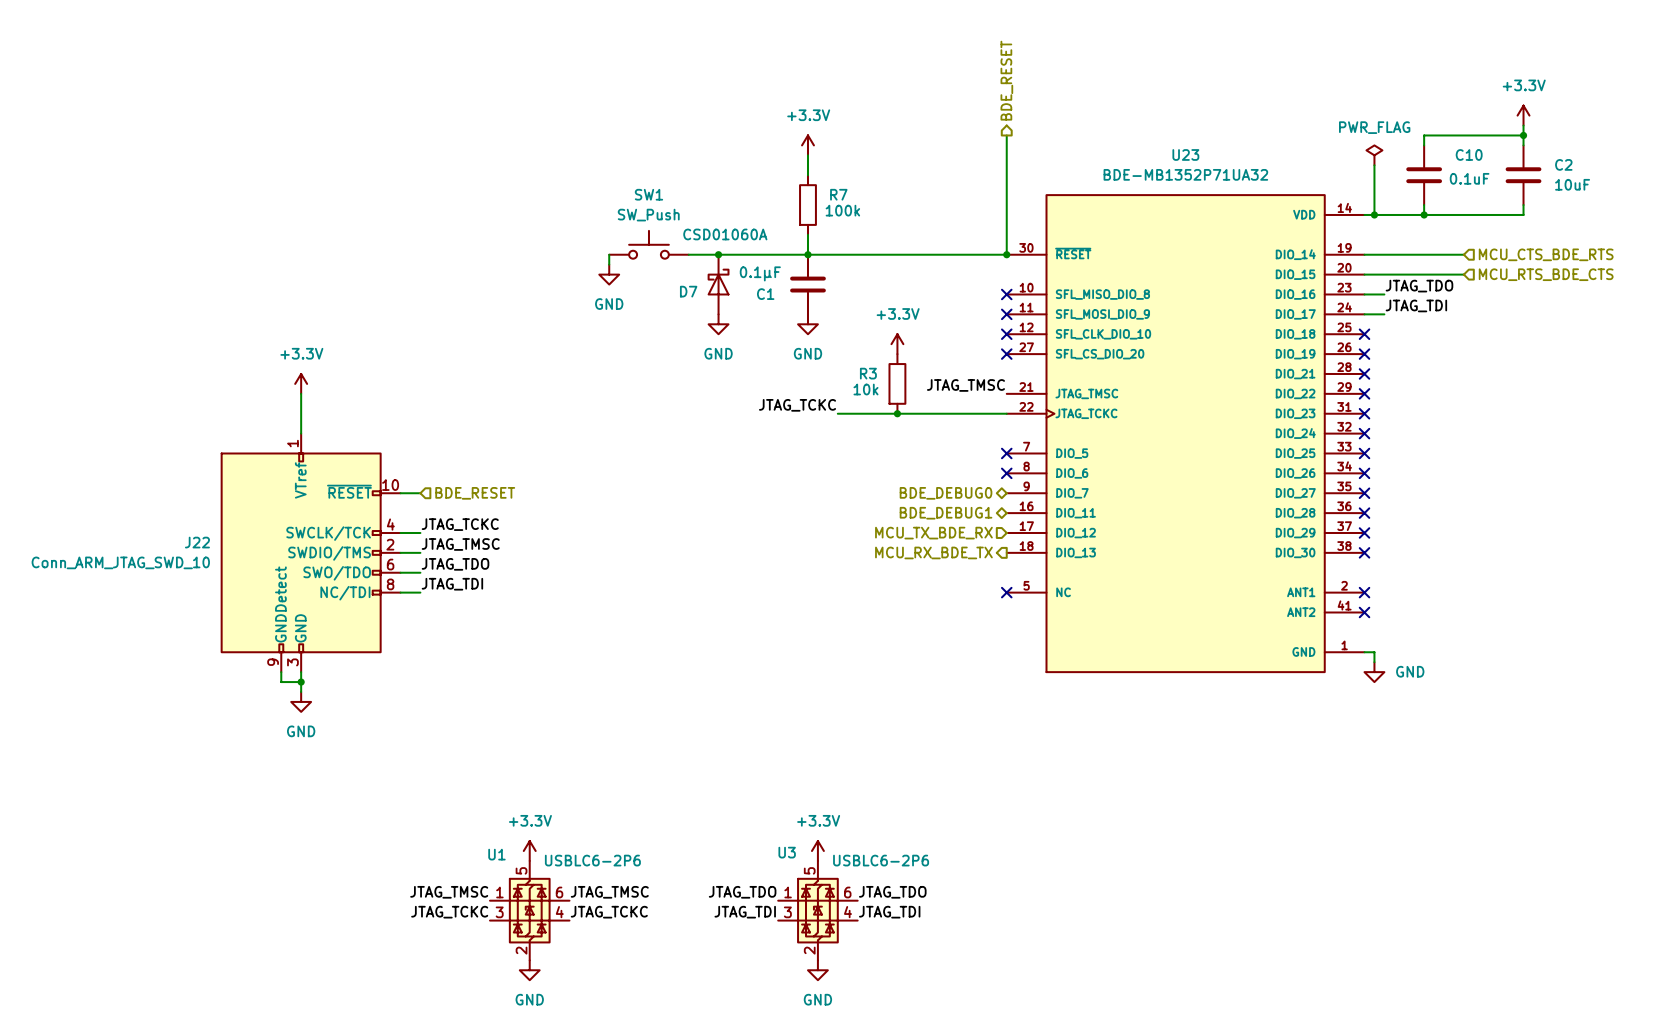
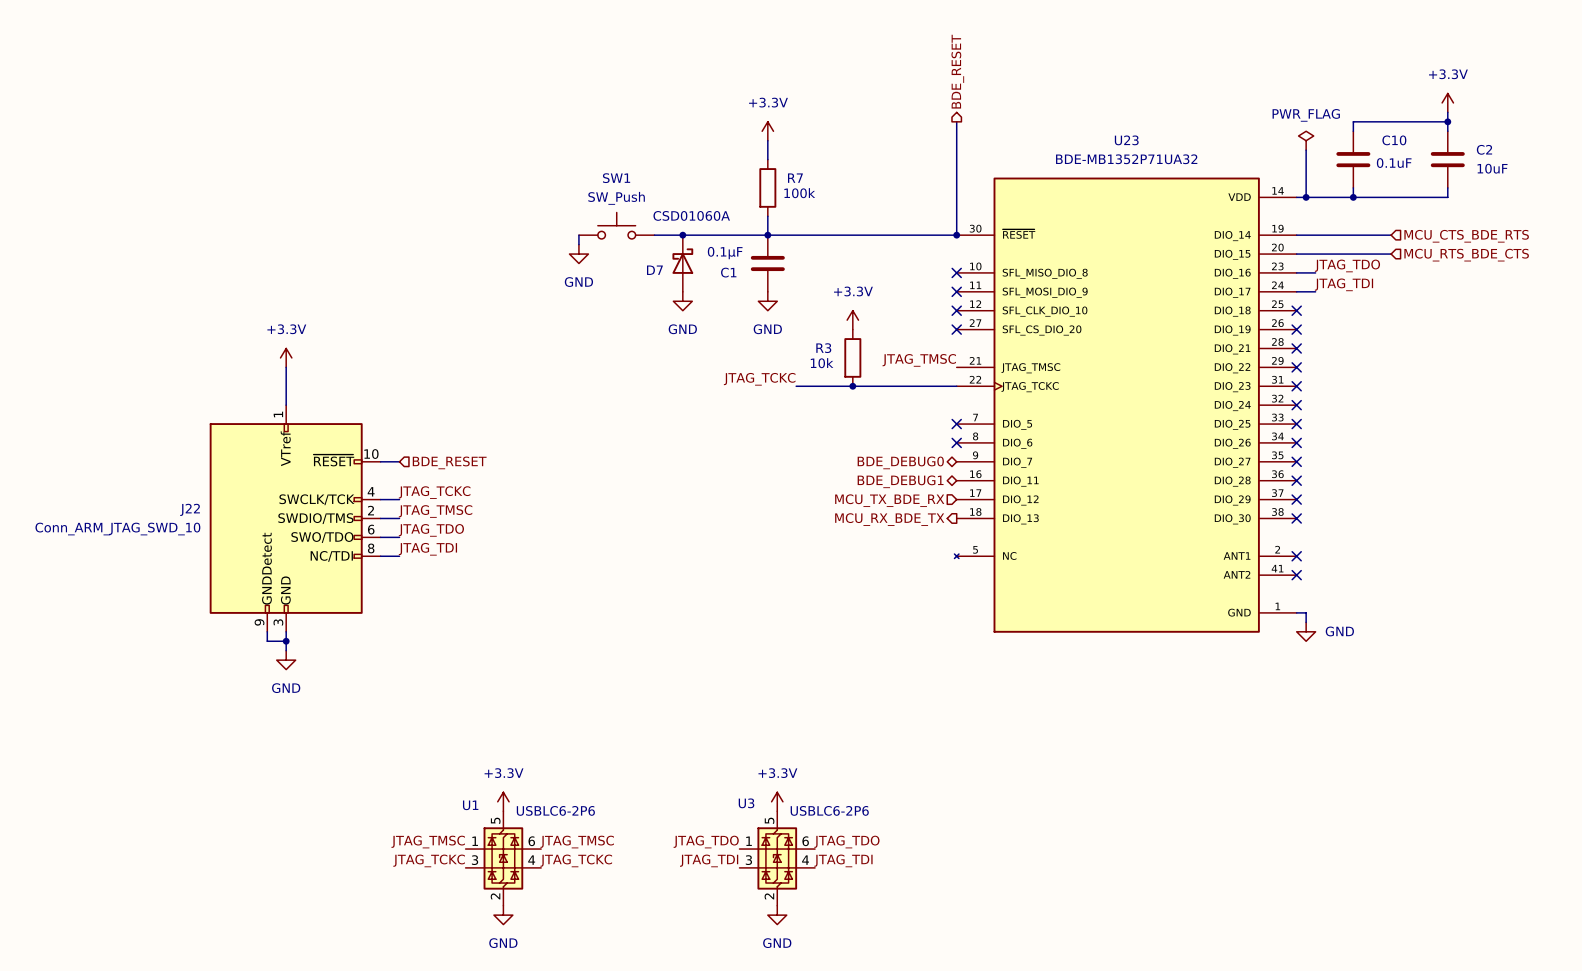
U23 symbol: [1006, 194, 1365, 674] -> [954, 177, 1297, 633]
no-connect mark: (1006, 592) -> none

